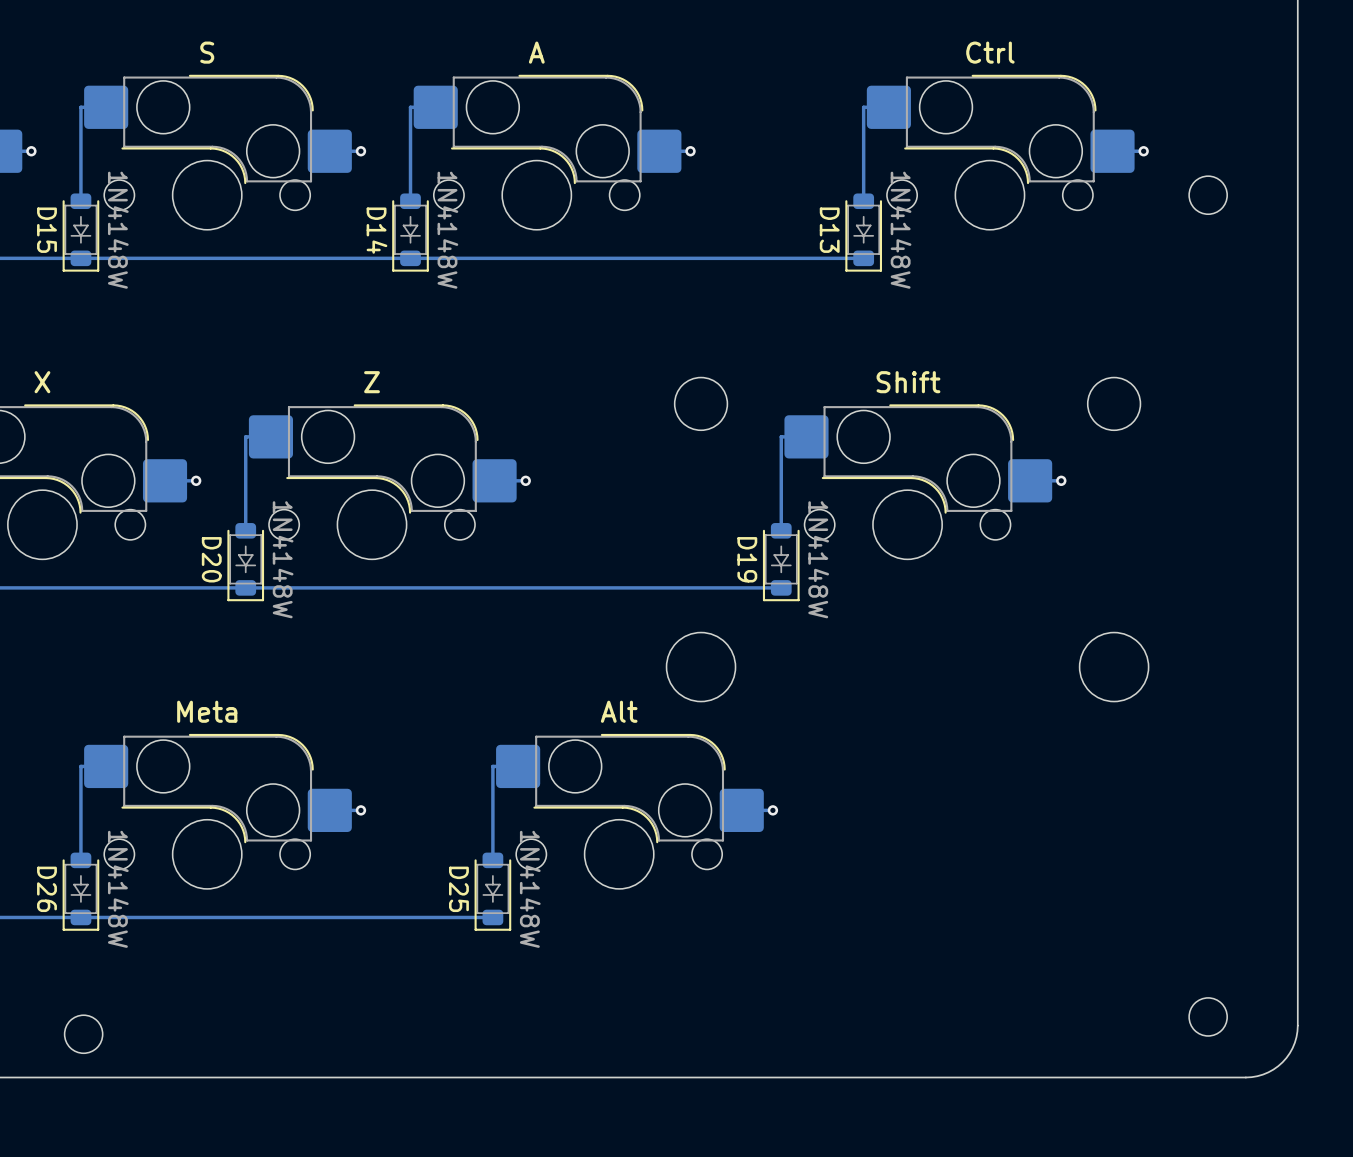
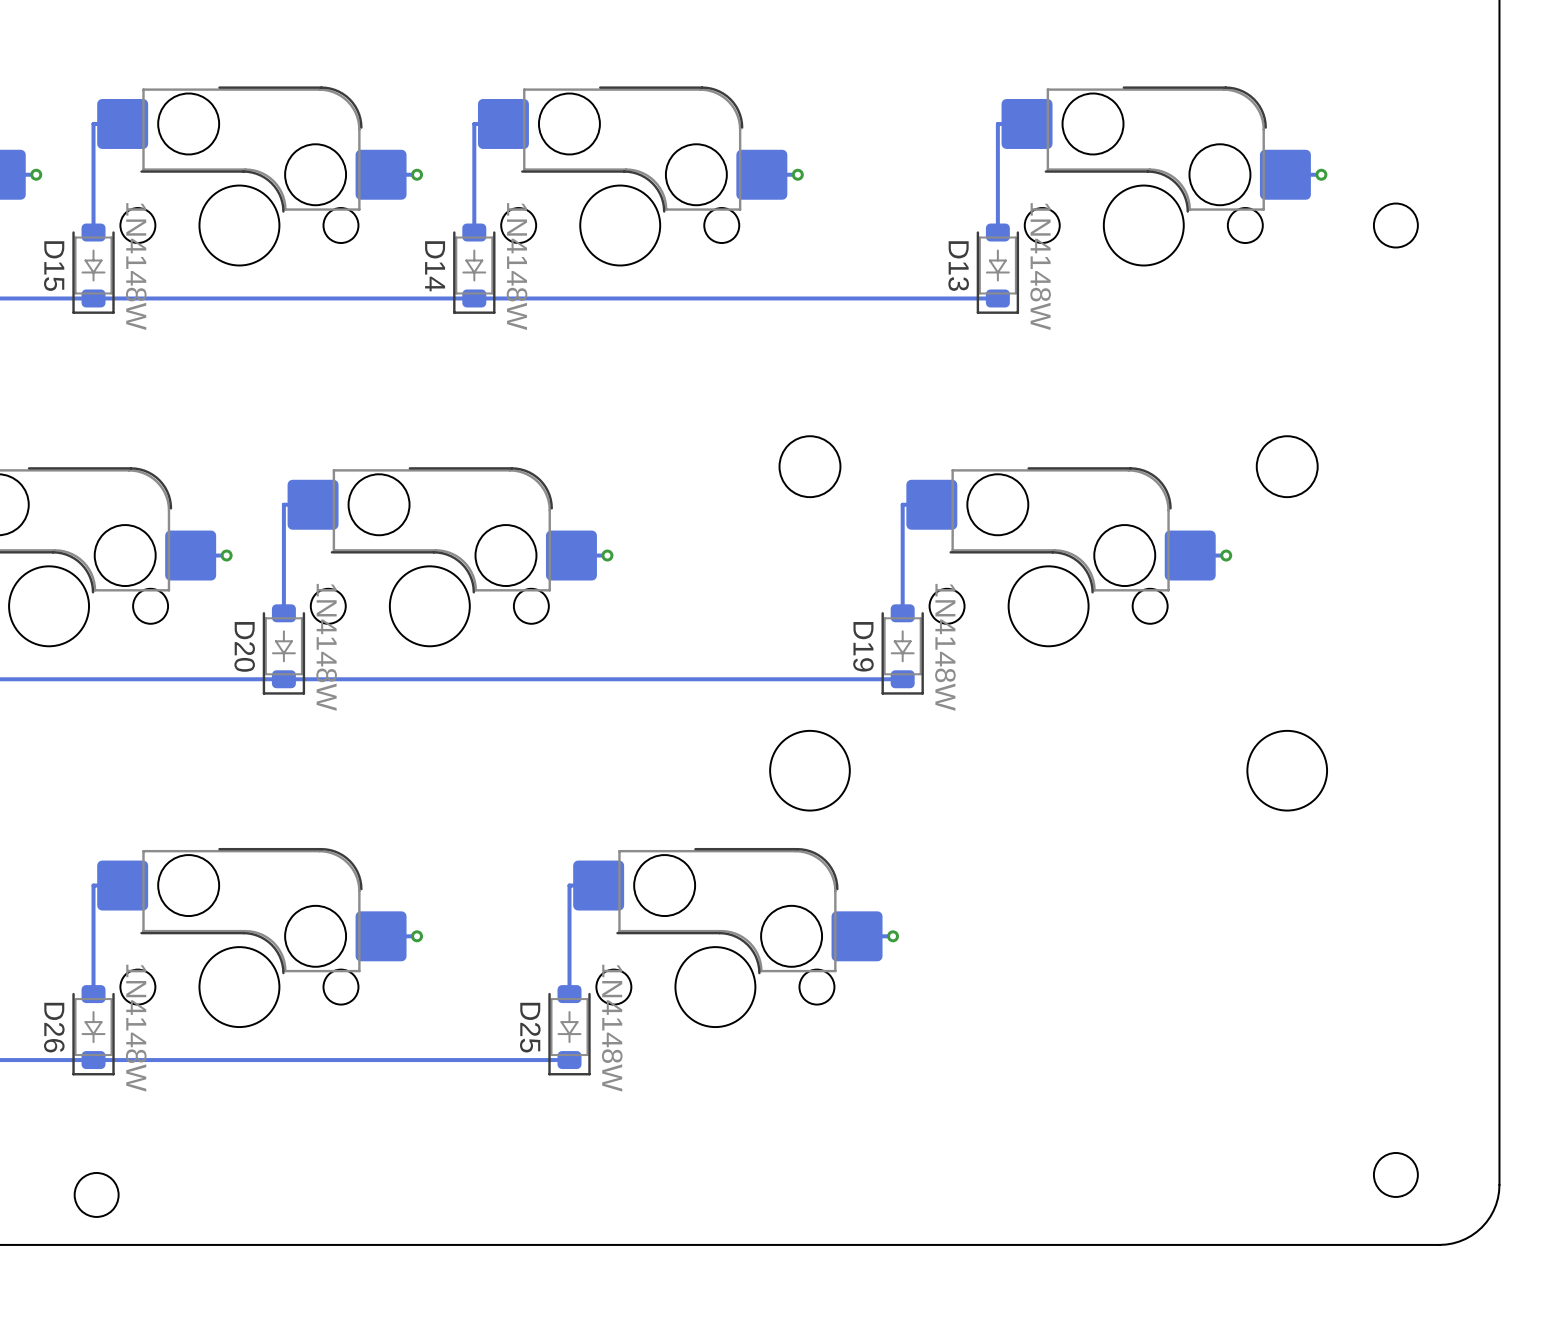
text: S (207, 52) -> none
text: A (536, 52) -> none
text: Ctrl (990, 52) -> none
text: X (42, 382) -> none
text: Z (372, 382) -> none
text: Shift (908, 382) -> none
text: Meta (207, 711) -> none
text: Alt (619, 711) -> none

